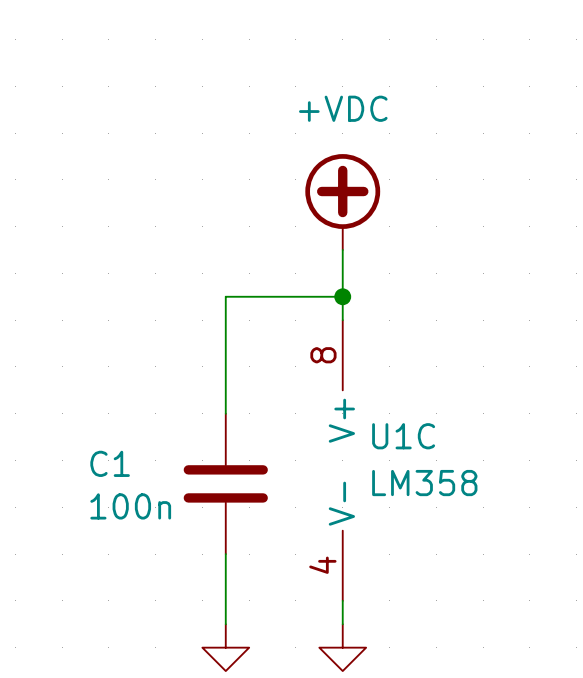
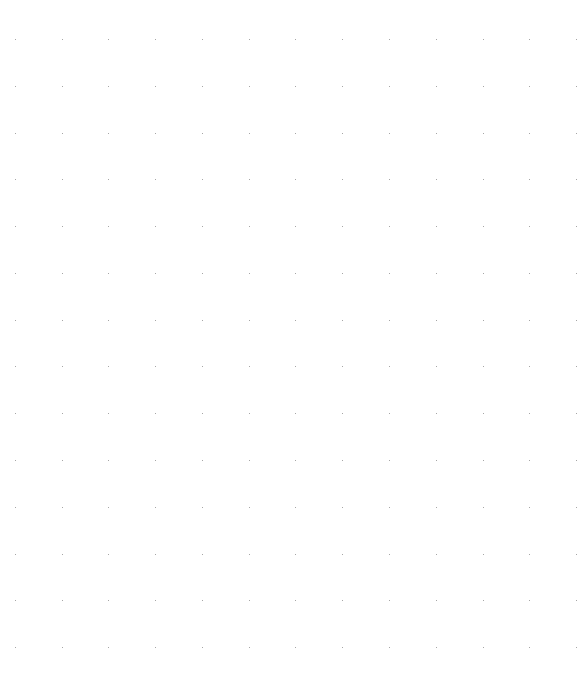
power symbol: +VDC (342, 202) -> none
wire: (342, 249) (342, 320) -> none
wire: (342, 296) (225, 296) (225, 413) -> none
junction: (342, 296) -> none
U1C: LM358 (342, 460) -> none
C1: 100n (225, 483) -> none
wire: (225, 554) (225, 624) -> none
wire: (342, 600) (342, 624) -> none
power symbol: (225, 647) -> none
power symbol: (342, 647) -> none

